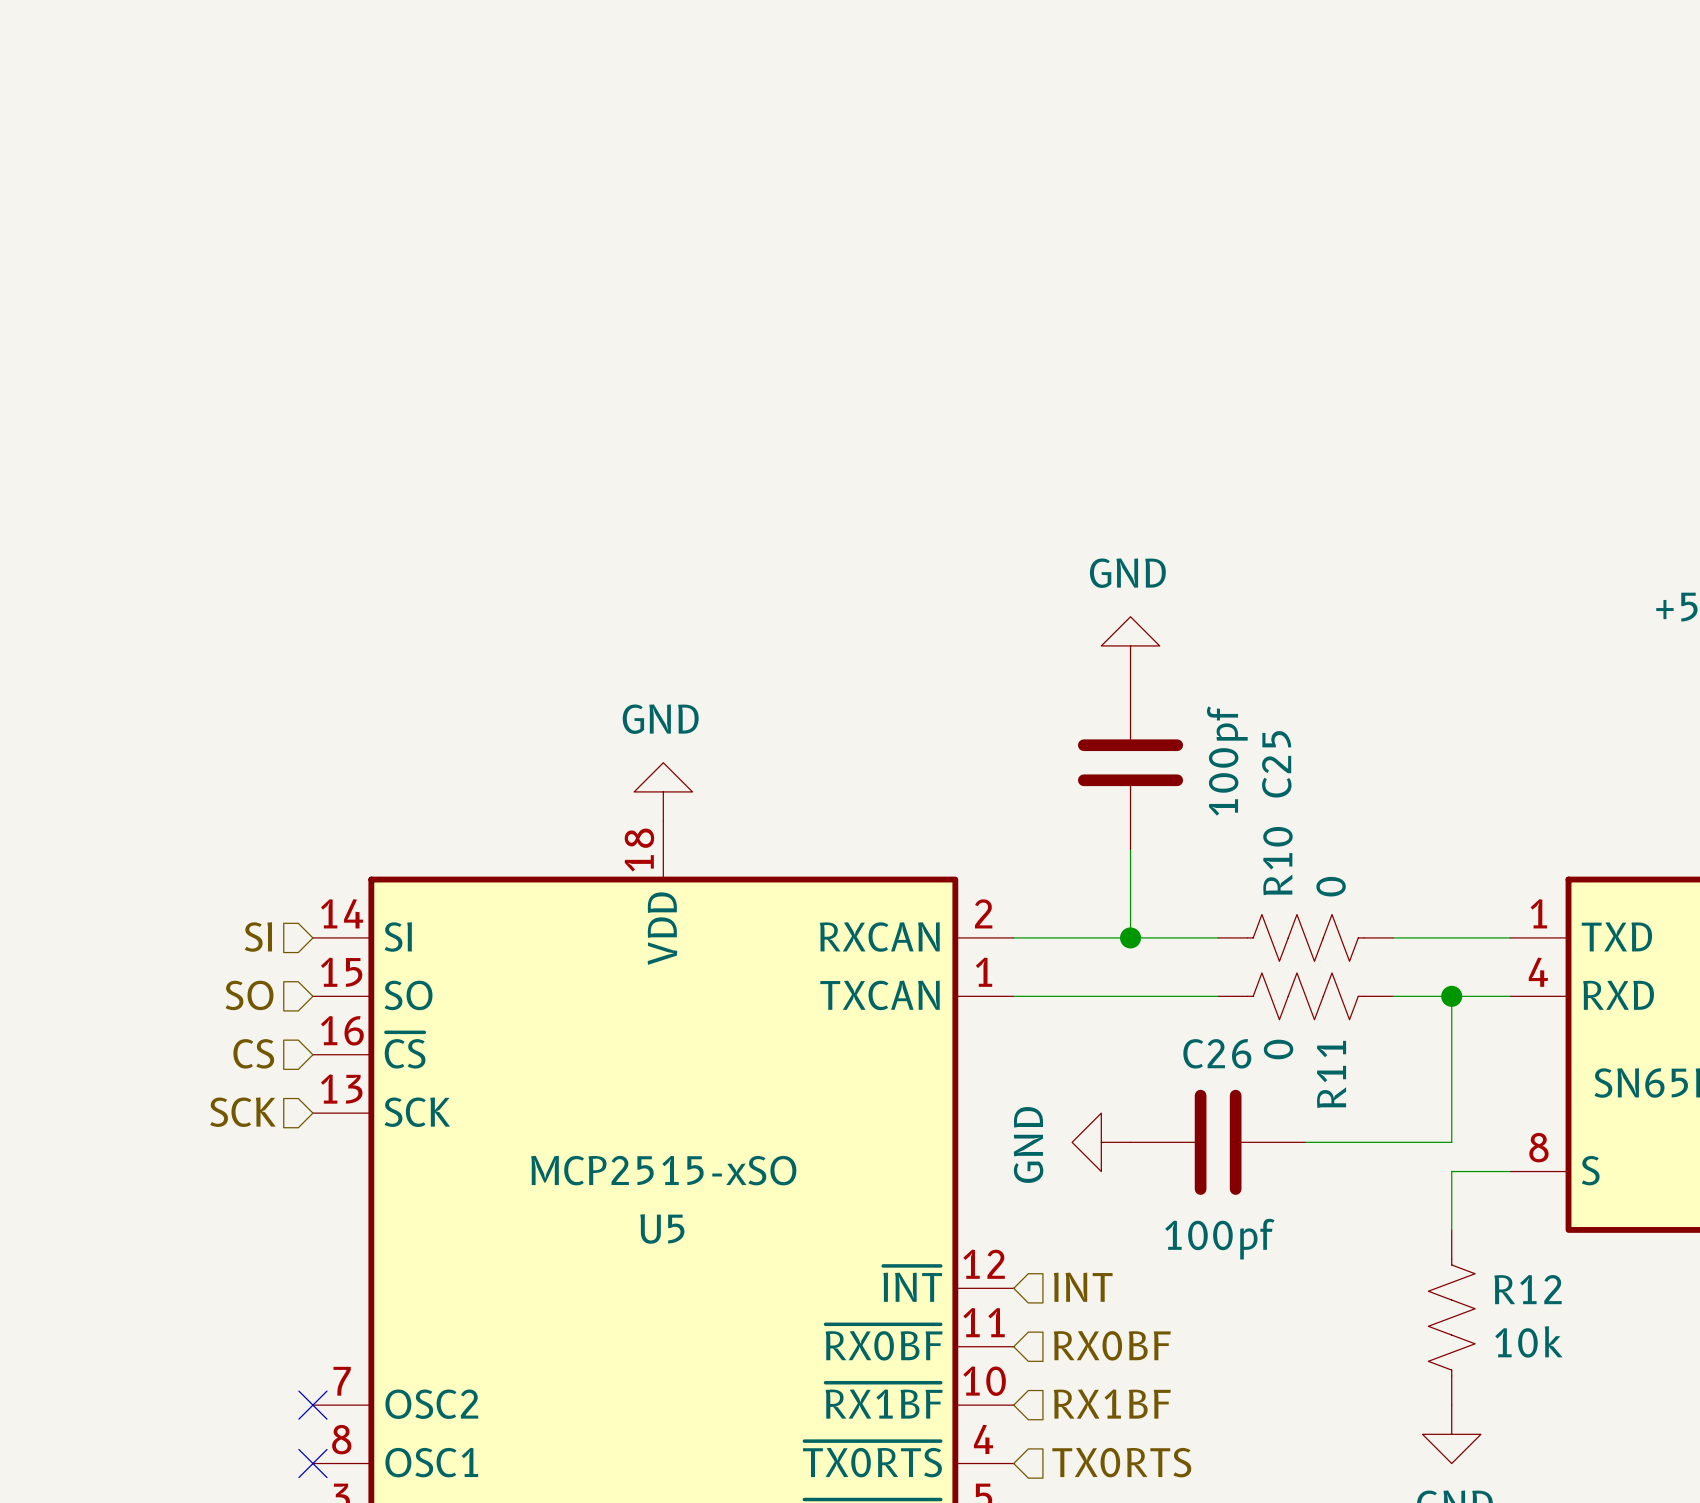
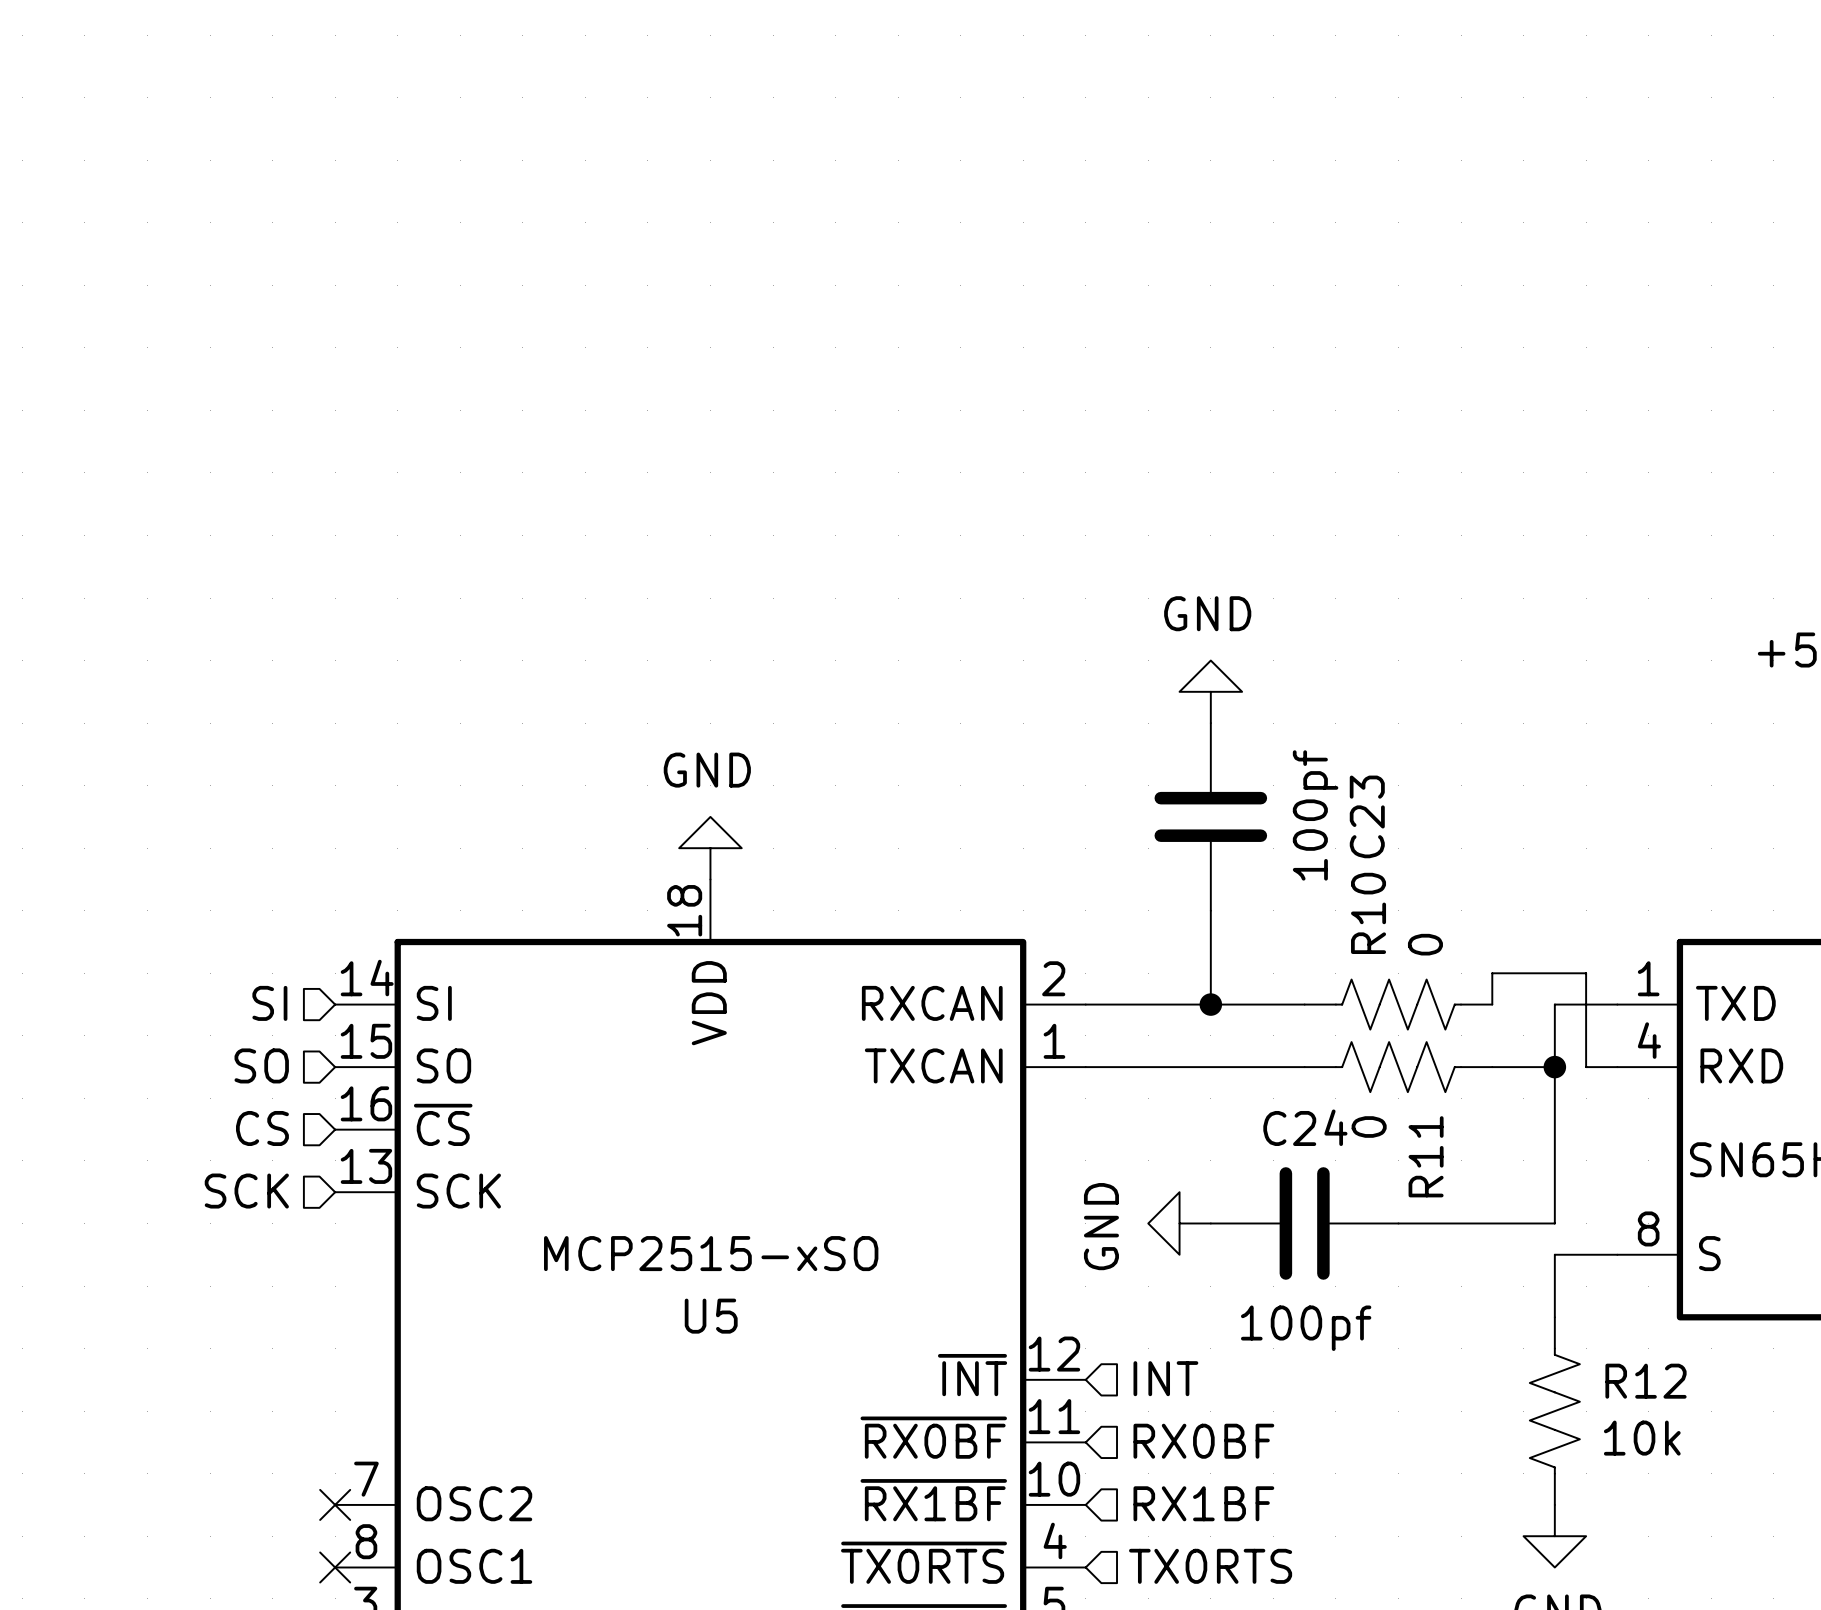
C25 name: C25 (1276, 764) -> C23 (1367, 816)
wire: (1393, 937) (1451, 937) -> (1492, 1004) (1492, 973) (1586, 973) (1586, 1067)
wire: (1451, 996) (1480, 996) -> (1554, 1067) (1554, 1004)
C26 name: C26 (1217, 1053) -> C24 (1305, 1127)

